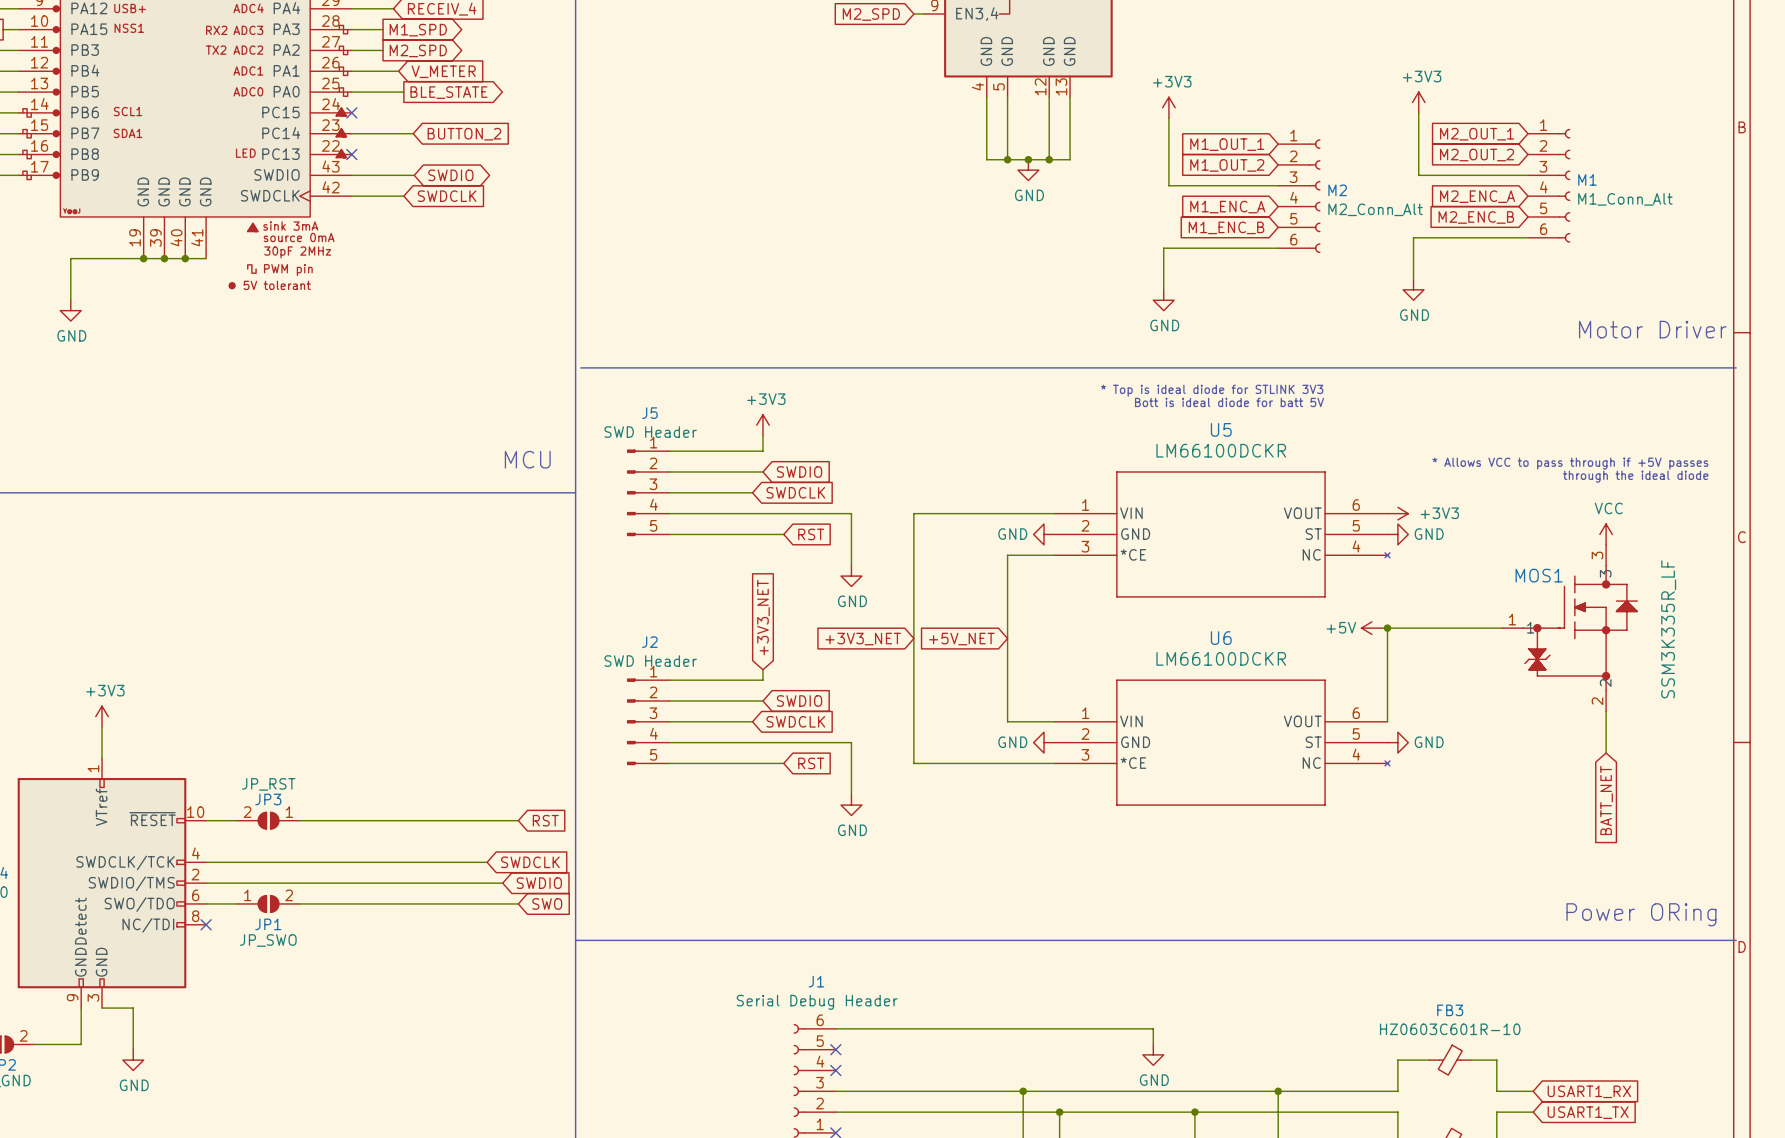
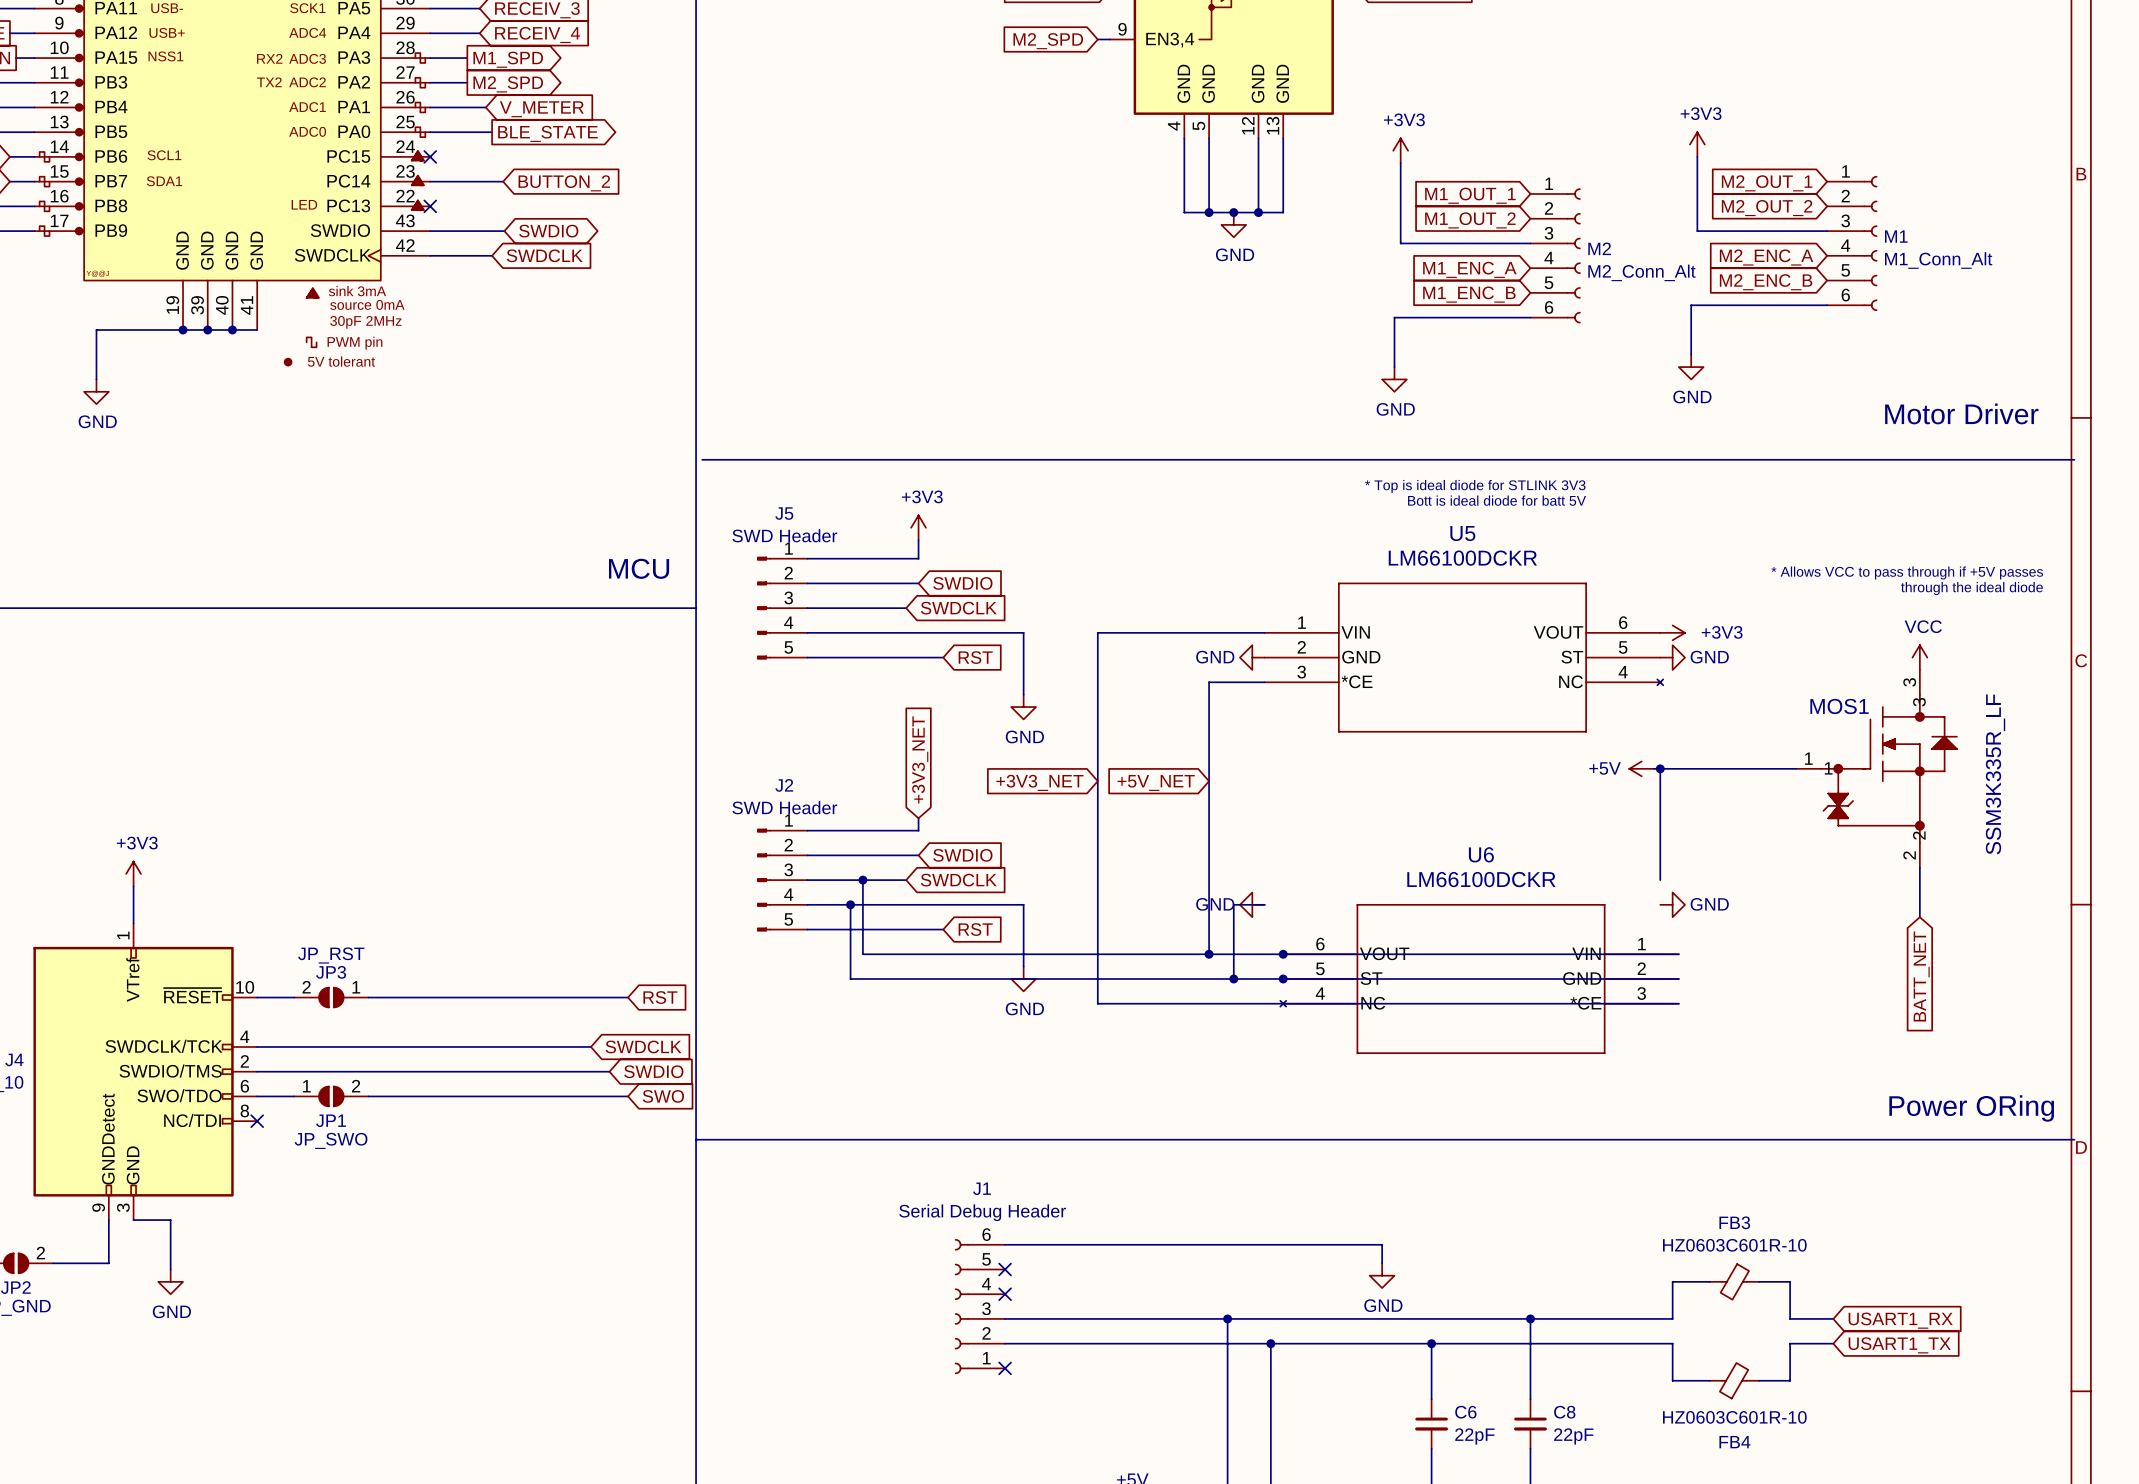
wire: none -> (862, 880) (862, 954) (1678, 954)
junction: none -> (862, 880)
wire: (1007, 721) (1054, 721) -> (1209, 880) (1209, 954)
wire: none -> (850, 904) (850, 979) (1678, 979)
junction: none -> (850, 904)
wire: none -> (1264, 904) (1233, 904) (1233, 979)
U6 flip: as is (1253, 742) -> left-right (1442, 979)
wire: (913, 763) (1054, 763) -> (1097, 929) (1097, 1003) (1678, 1003)
junction: none -> (1209, 954)
junction: none -> (1283, 954)
junction: none -> (1233, 979)
junction: none -> (1283, 979)

